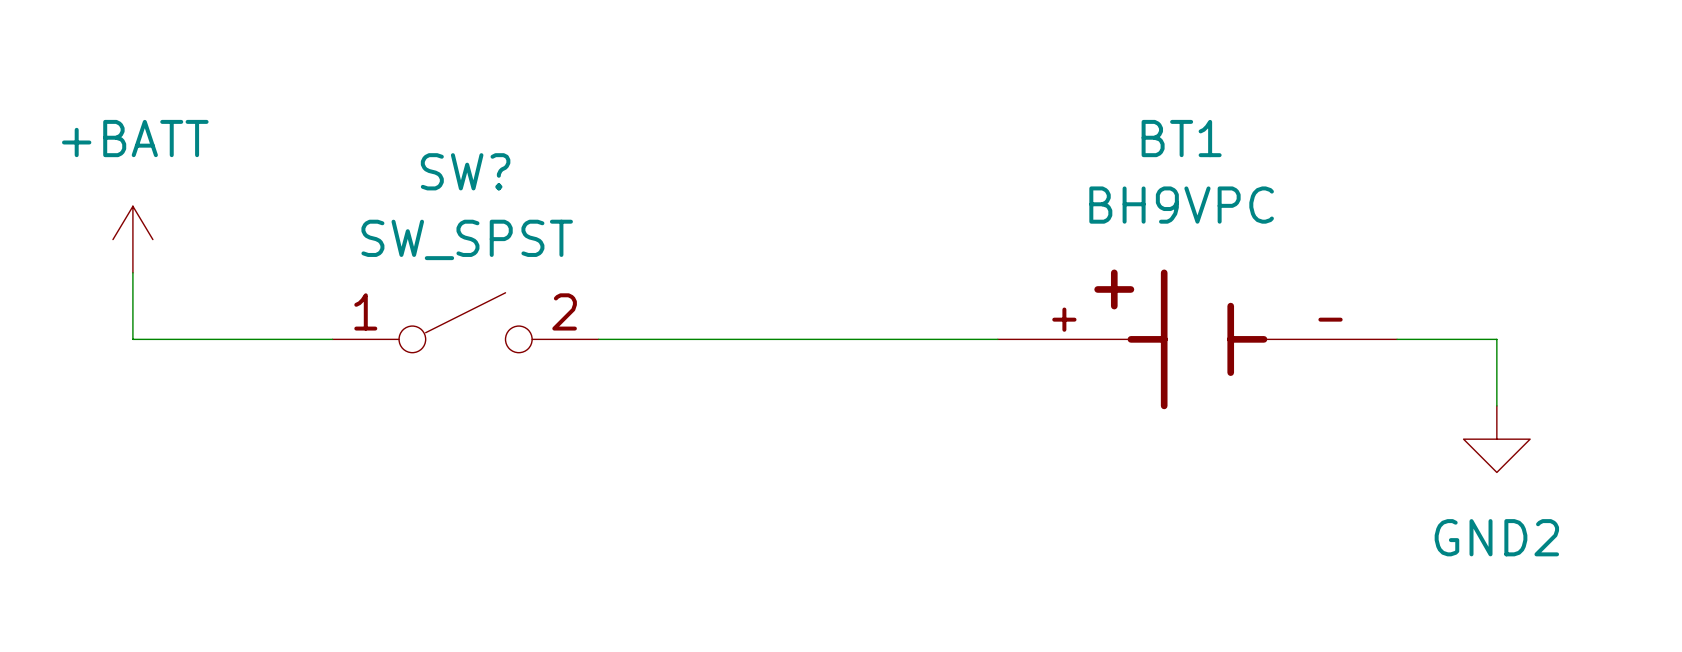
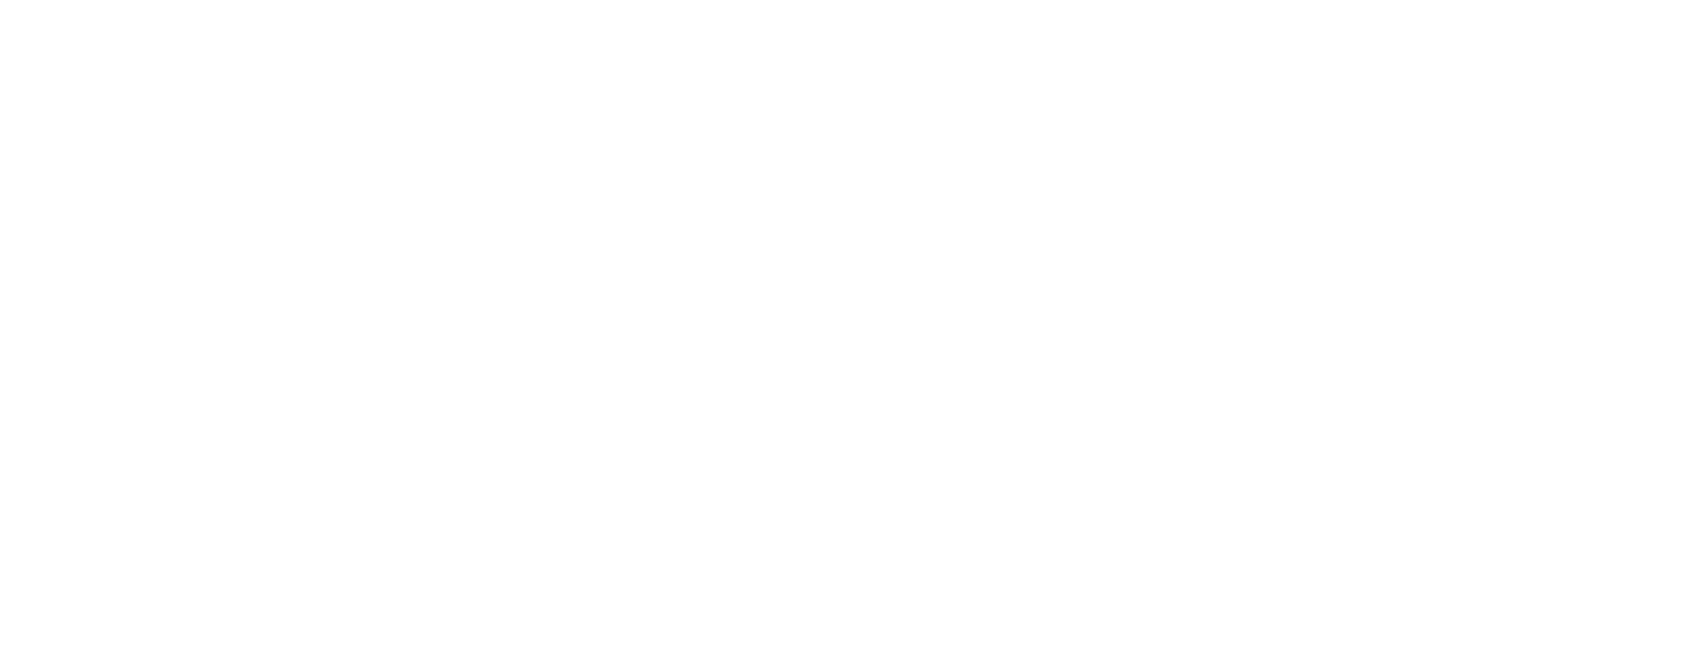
power symbol: +BATT (132, 239) -> none
wire: (132, 272) (132, 339) (332, 339) -> none
SW?: SW_SPST (465, 322) -> none
wire: (598, 339) (997, 339) -> none
BT1: BH9VPC (1197, 339) -> none
wire: (1397, 339) (1496, 339) (1496, 405) -> none
power symbol: GND2 (1496, 439) -> none

